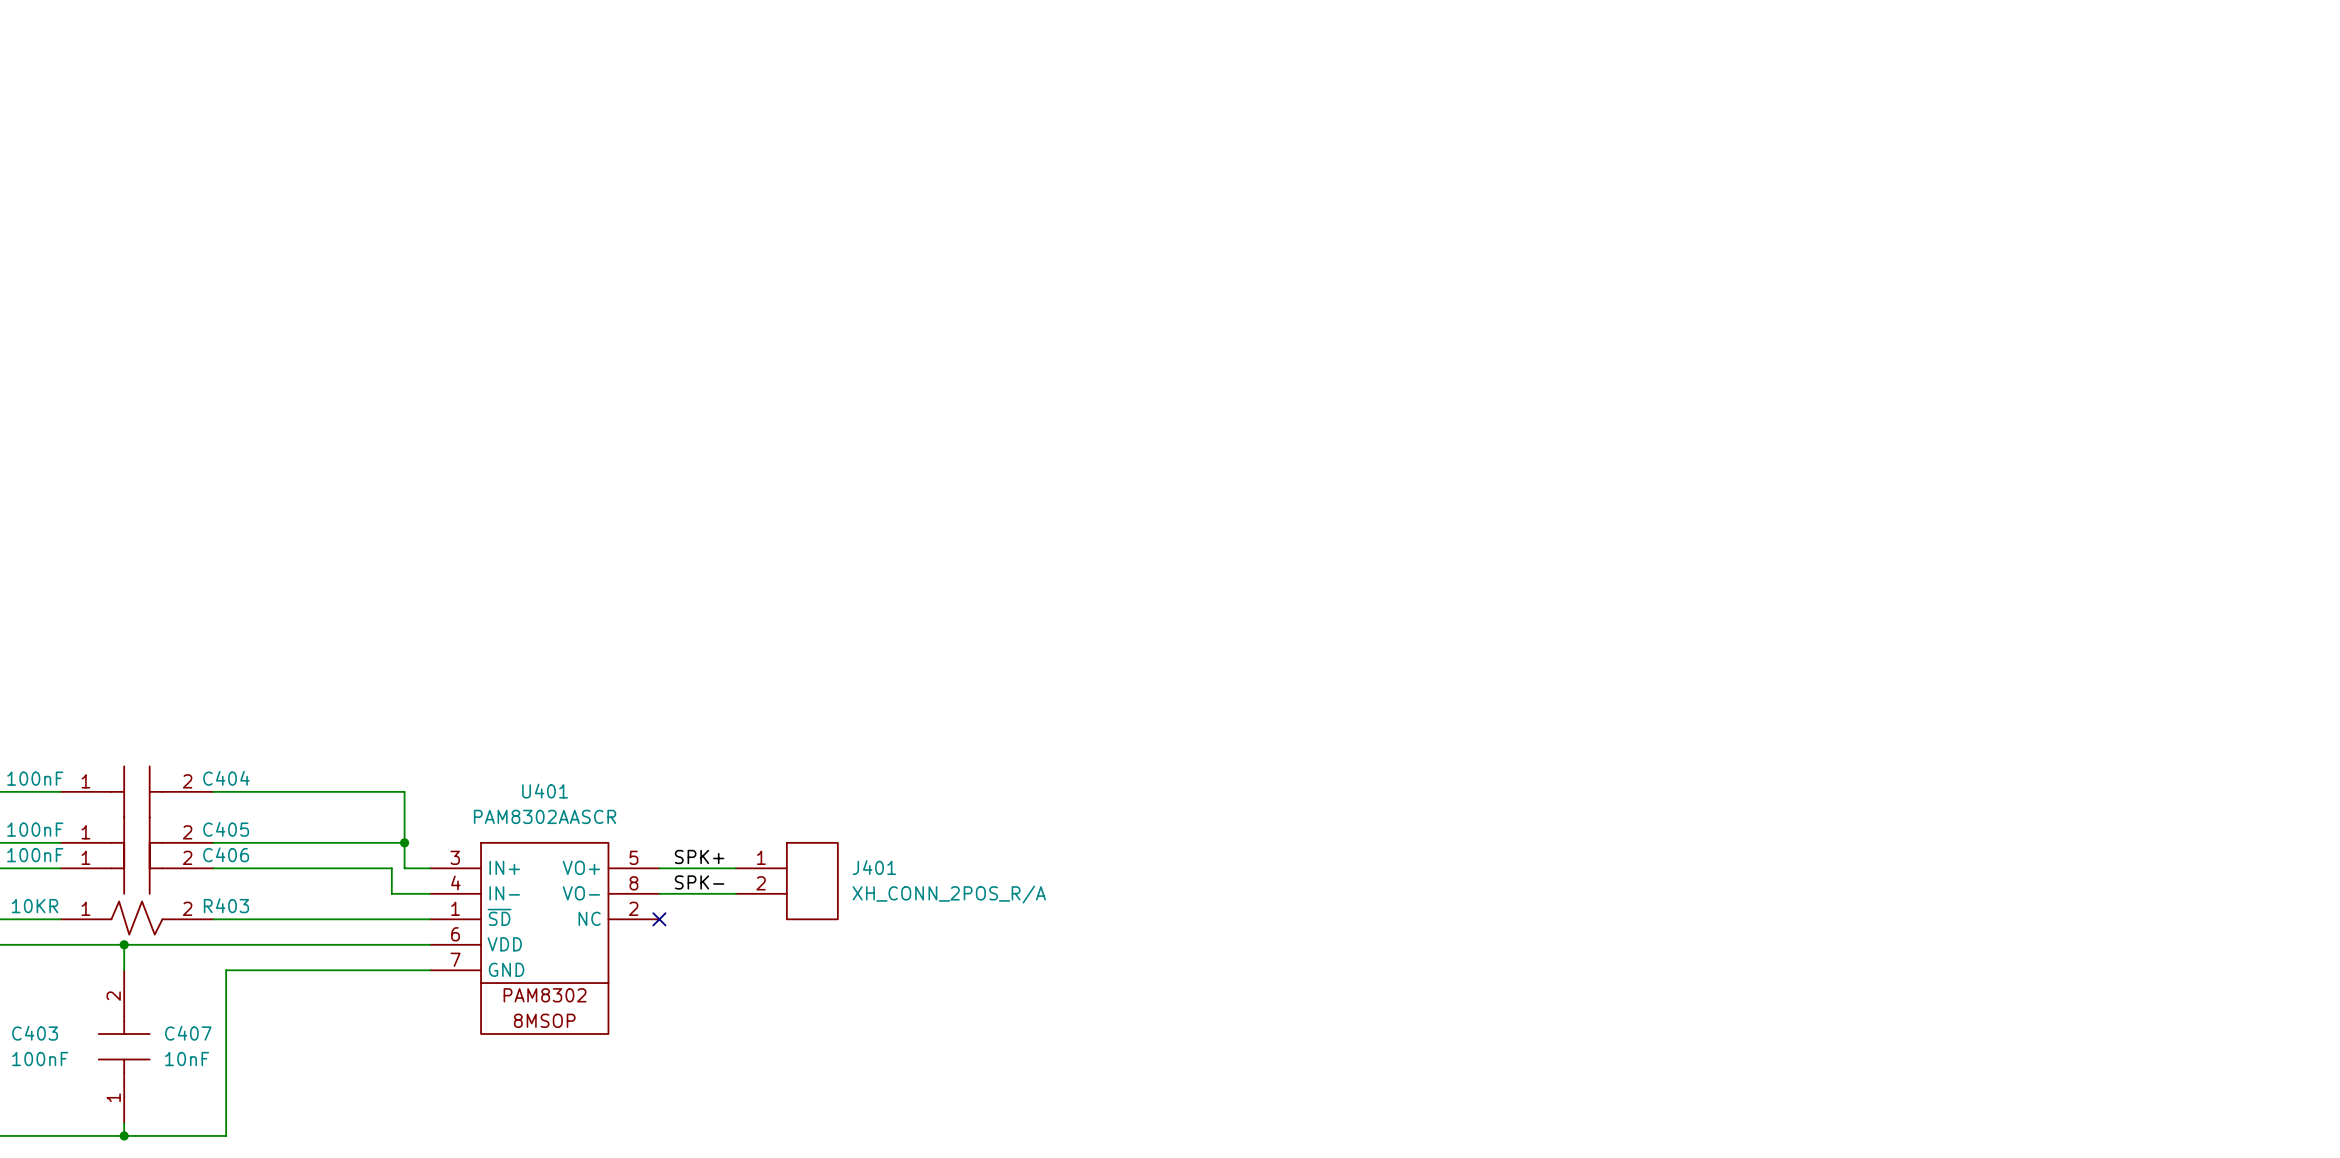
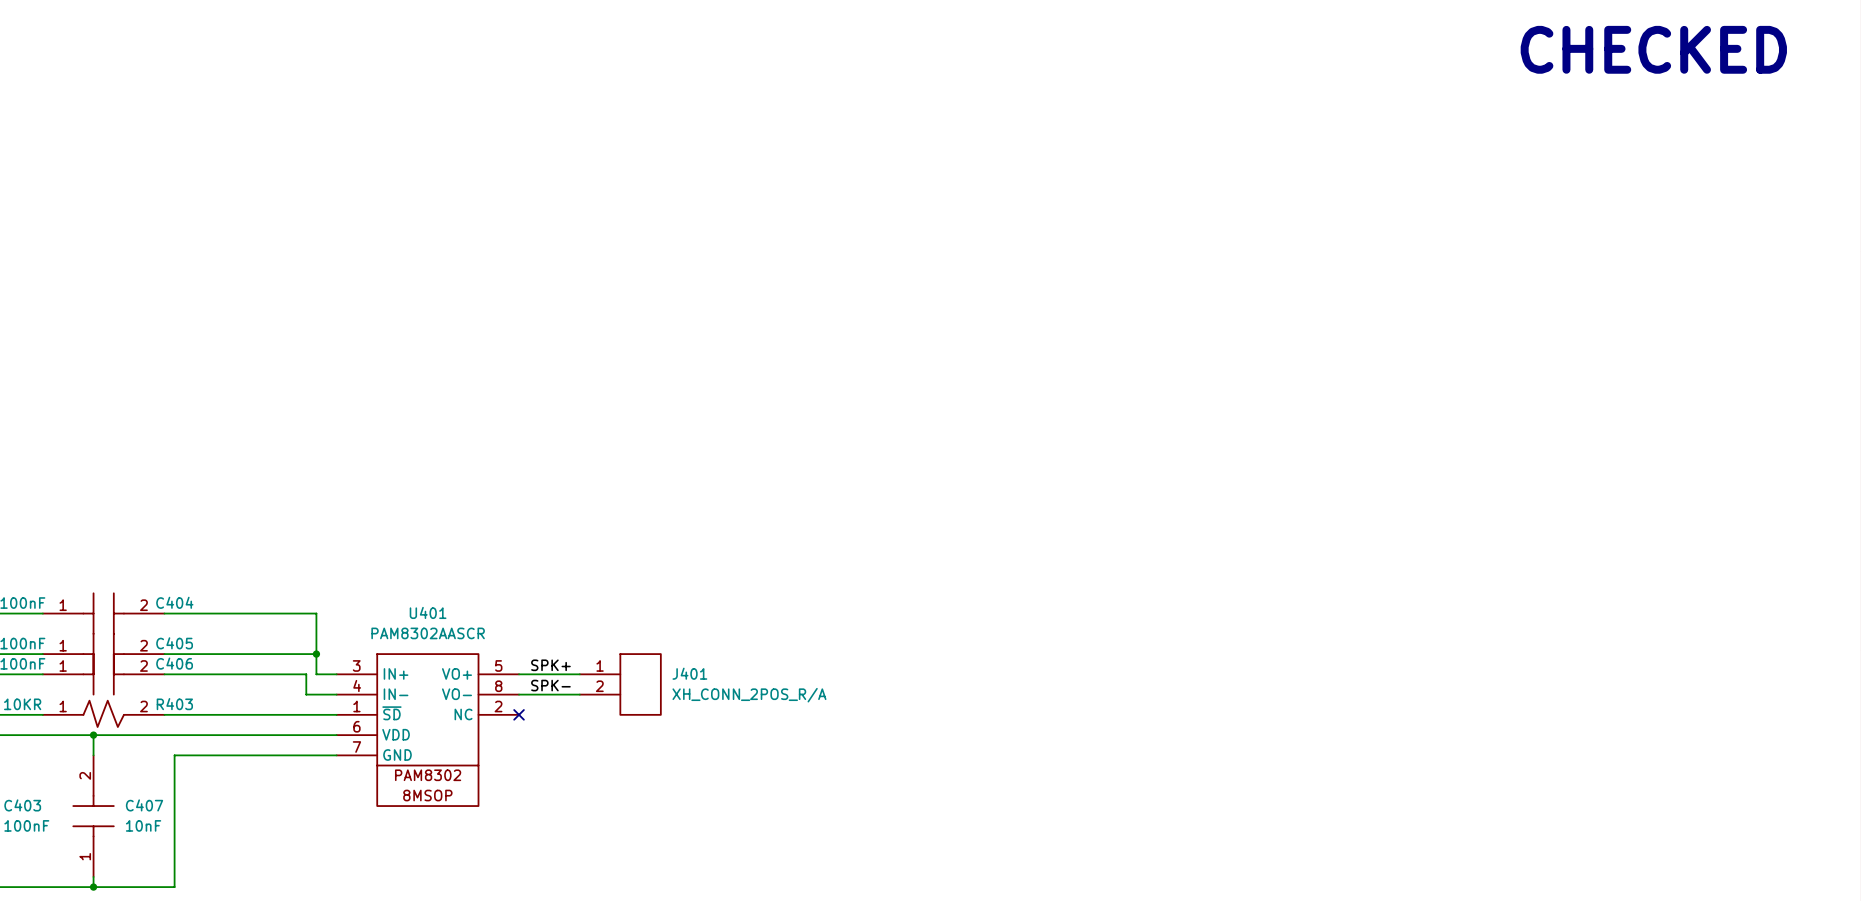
text: none -> CHECKED (1653, 49)

